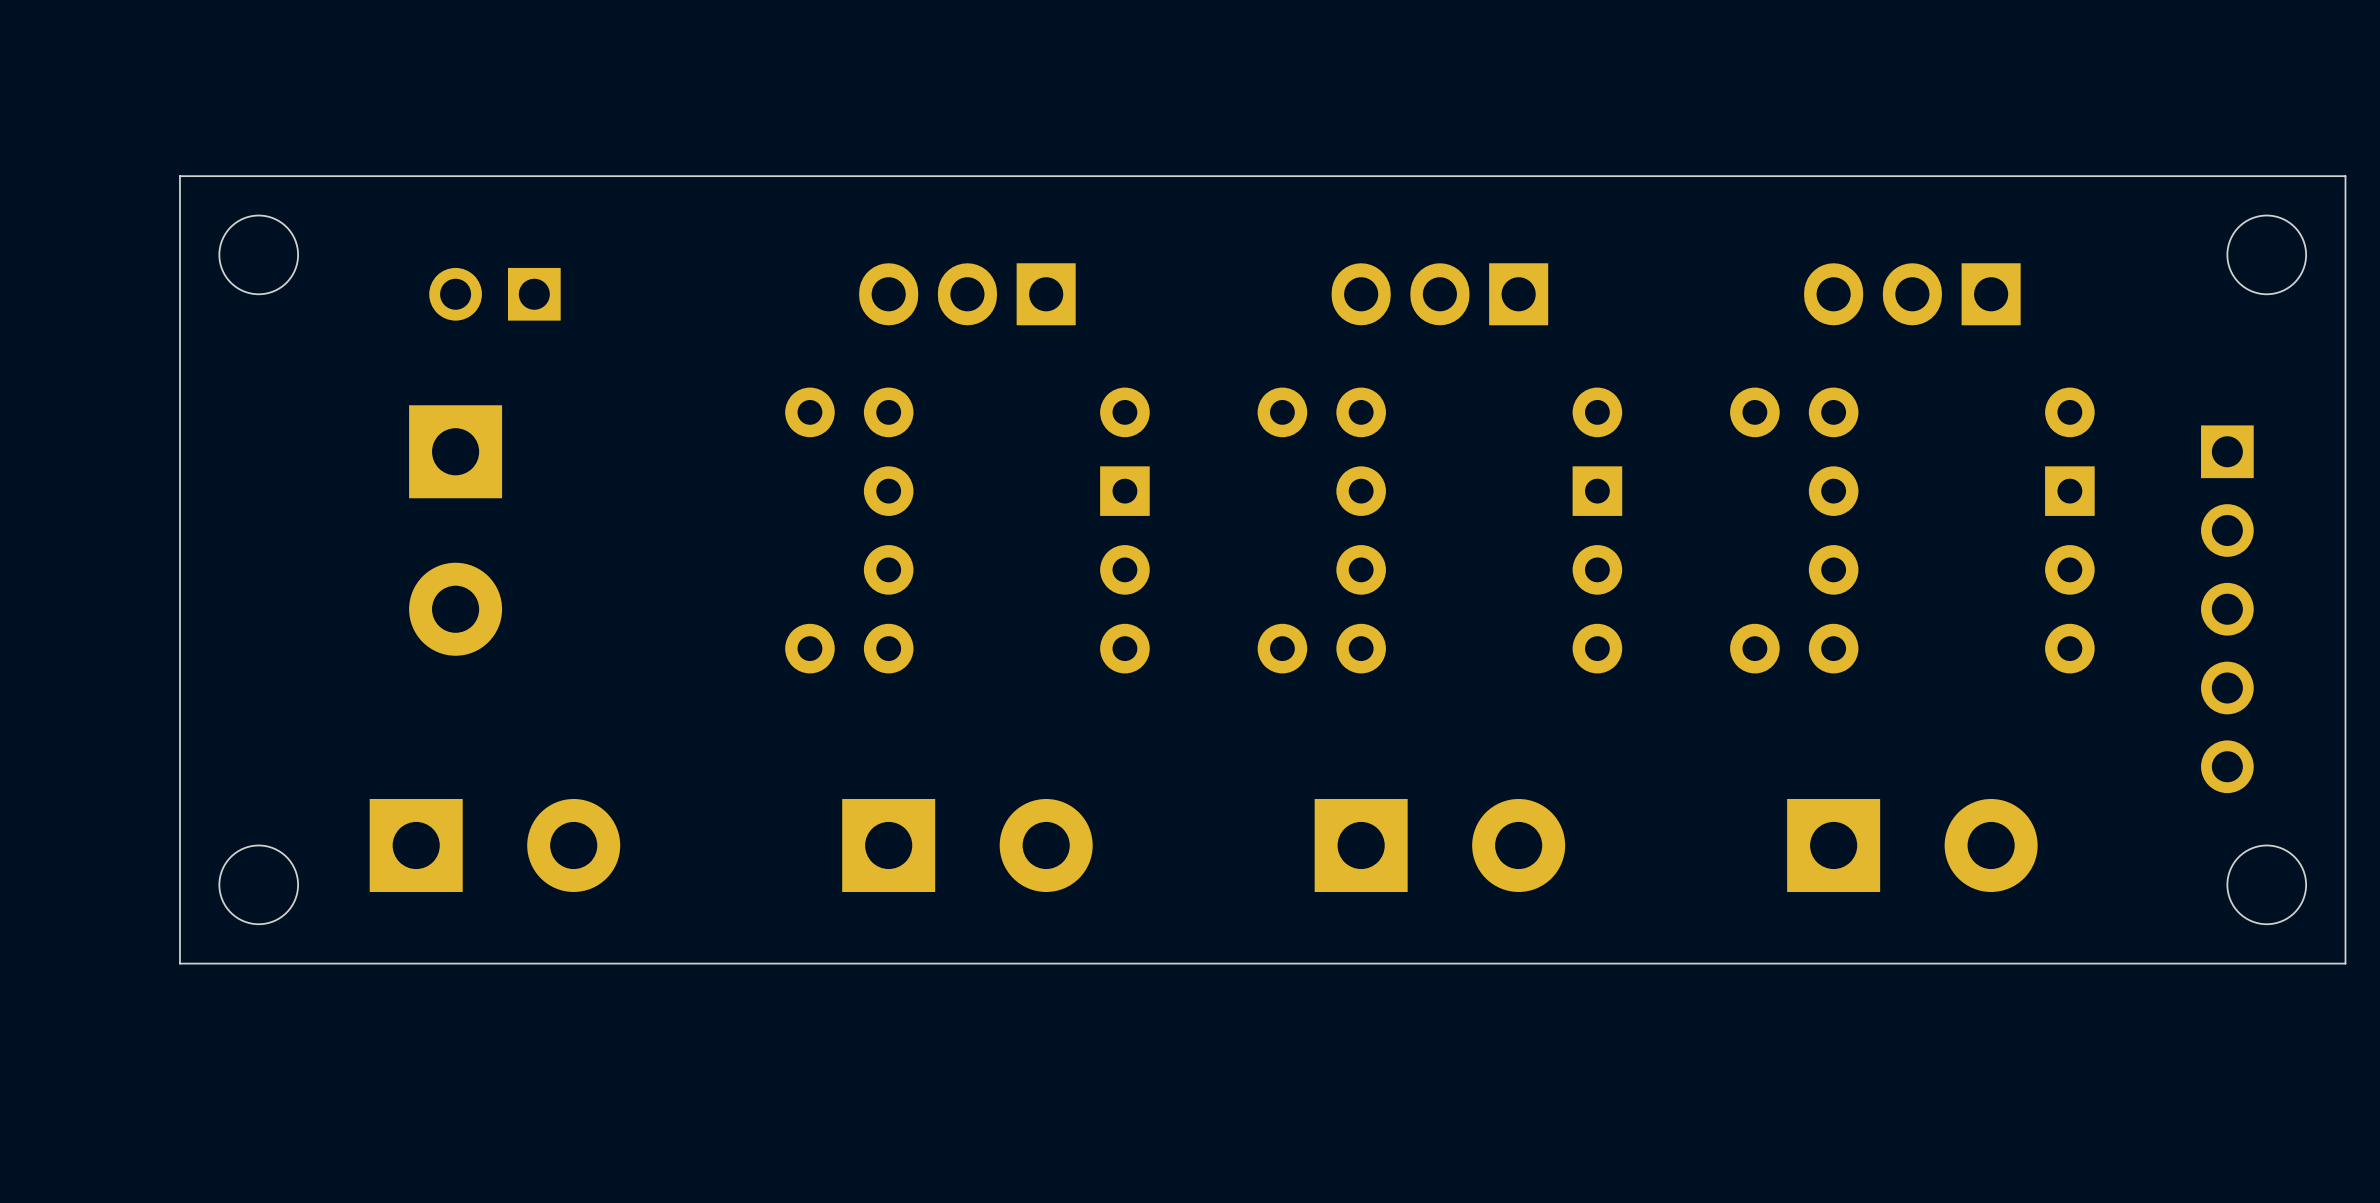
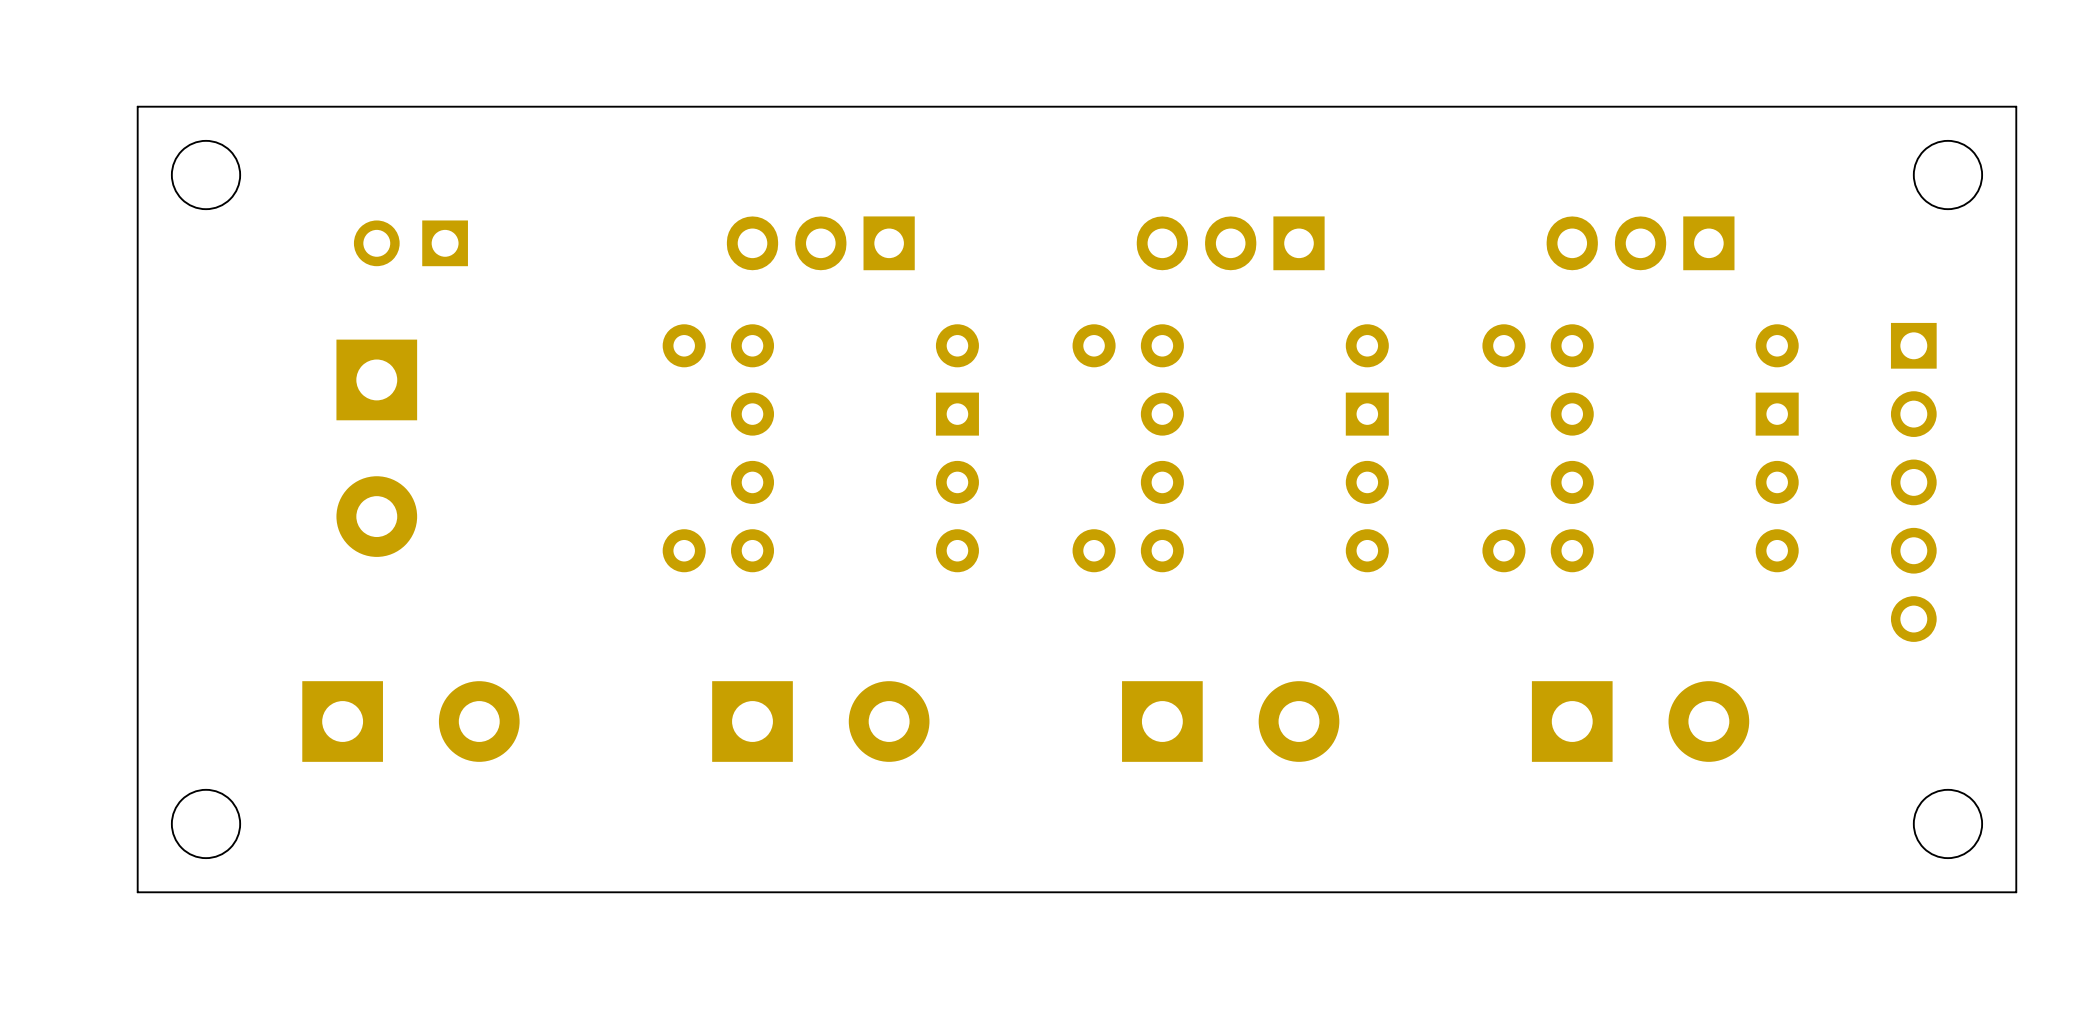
board edge: (2345, 176) (179, 176) -> (2016, 140) (2016, 106) (137, 106) (137, 140)
round board edge position: (258, 254) -> (206, 175)
round board edge position: (2266, 254) -> (1947, 175)
part position: (2227, 609) -> (1913, 482)
round board edge position: (258, 884) -> (206, 823)
round board edge position: (2266, 884) -> (1947, 823)
board edge: (2345, 963) (179, 963) -> (2016, 823) (2016, 892) (137, 892) (137, 823)

